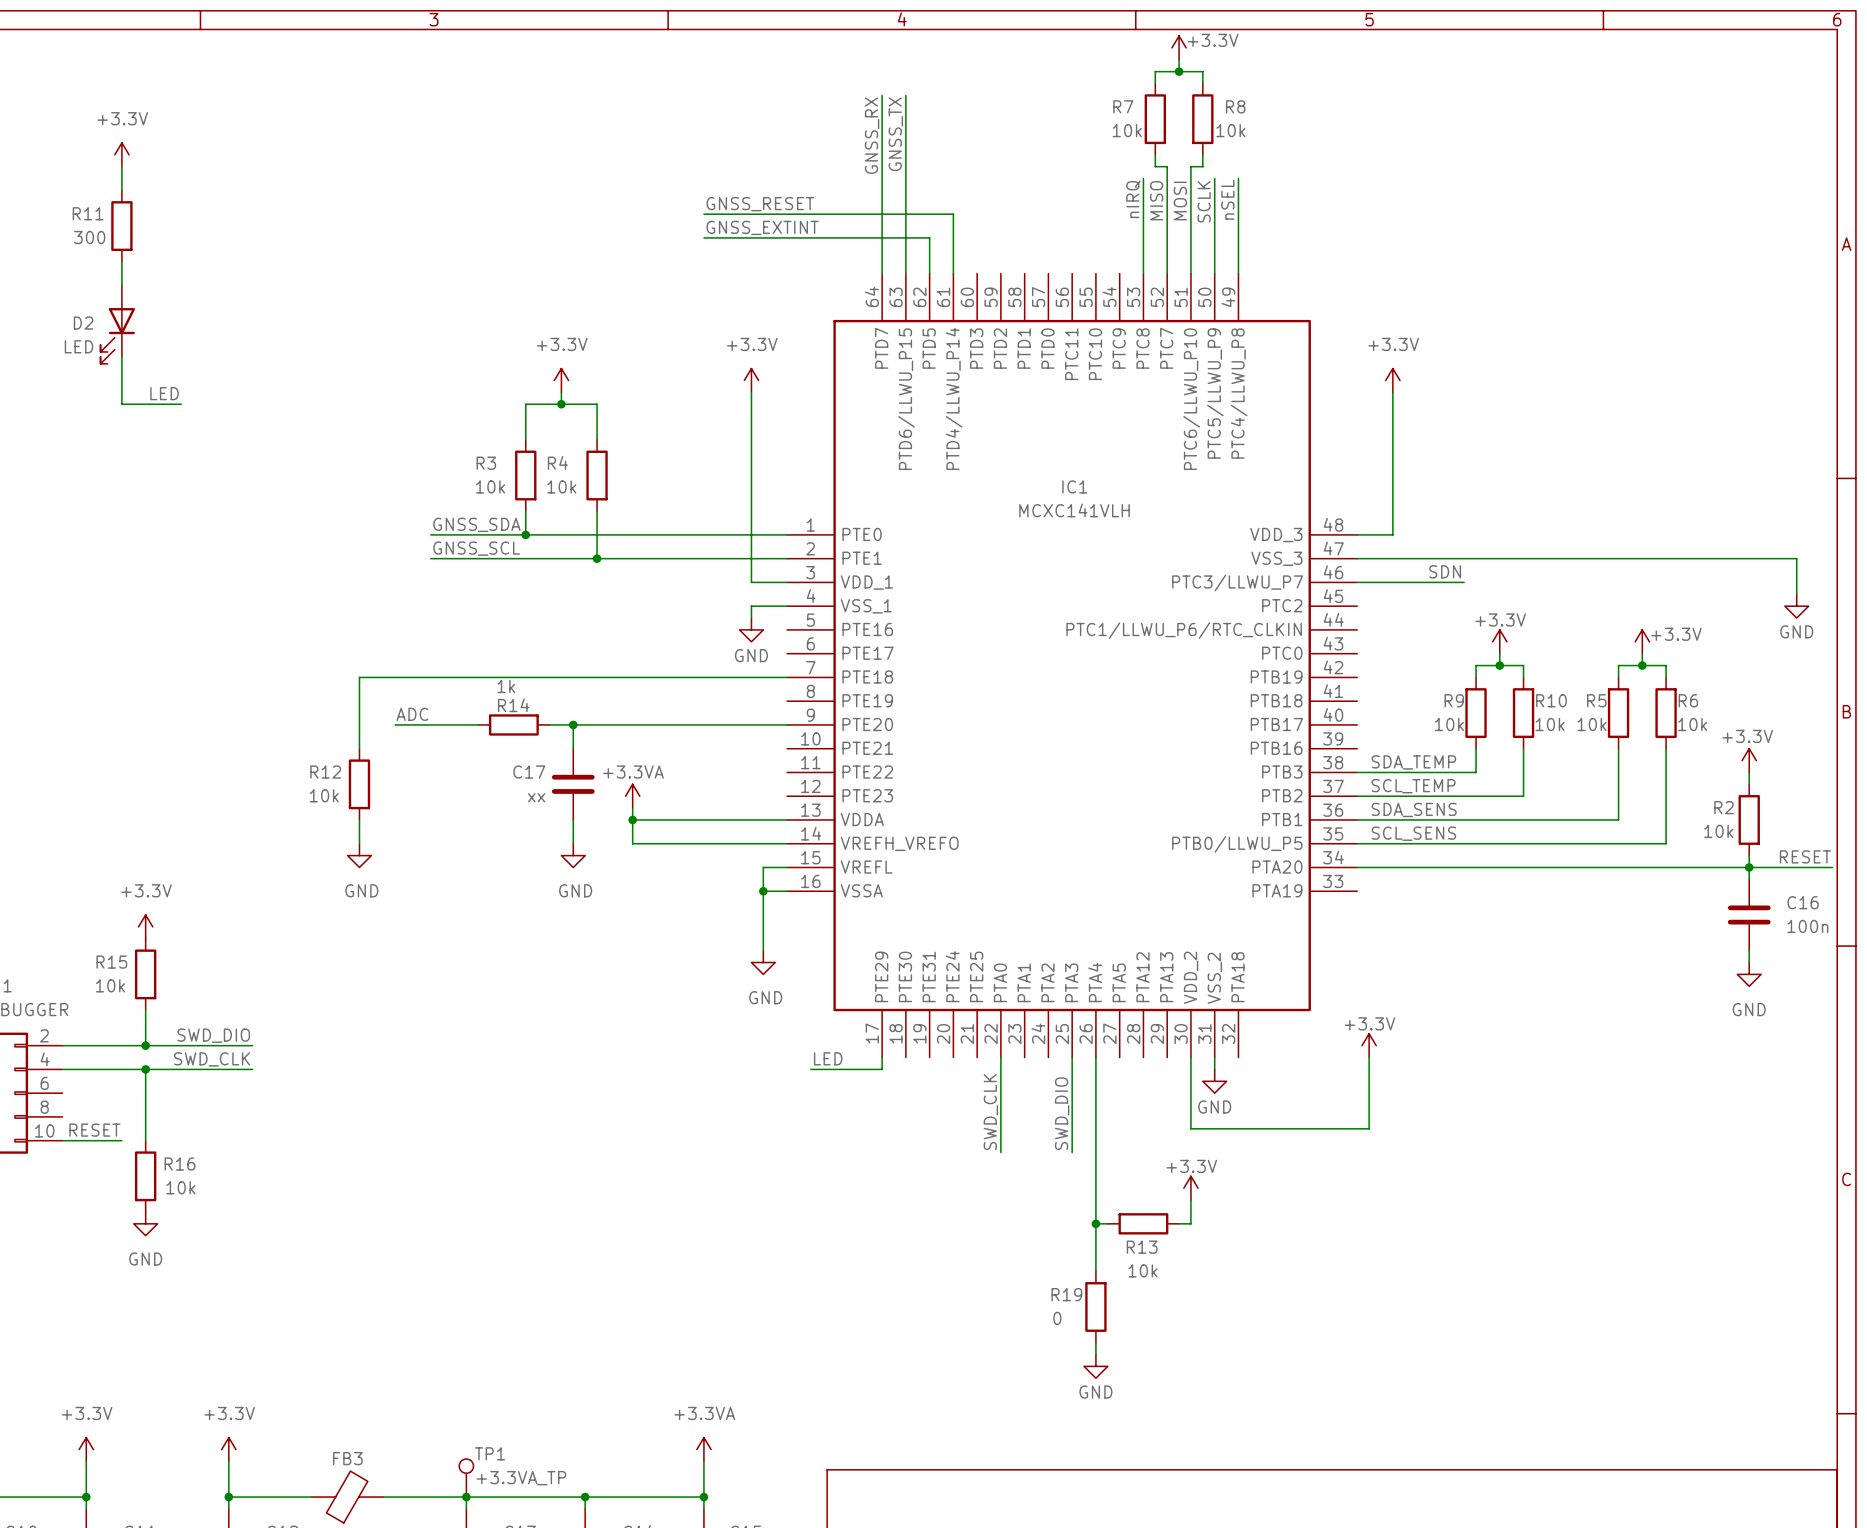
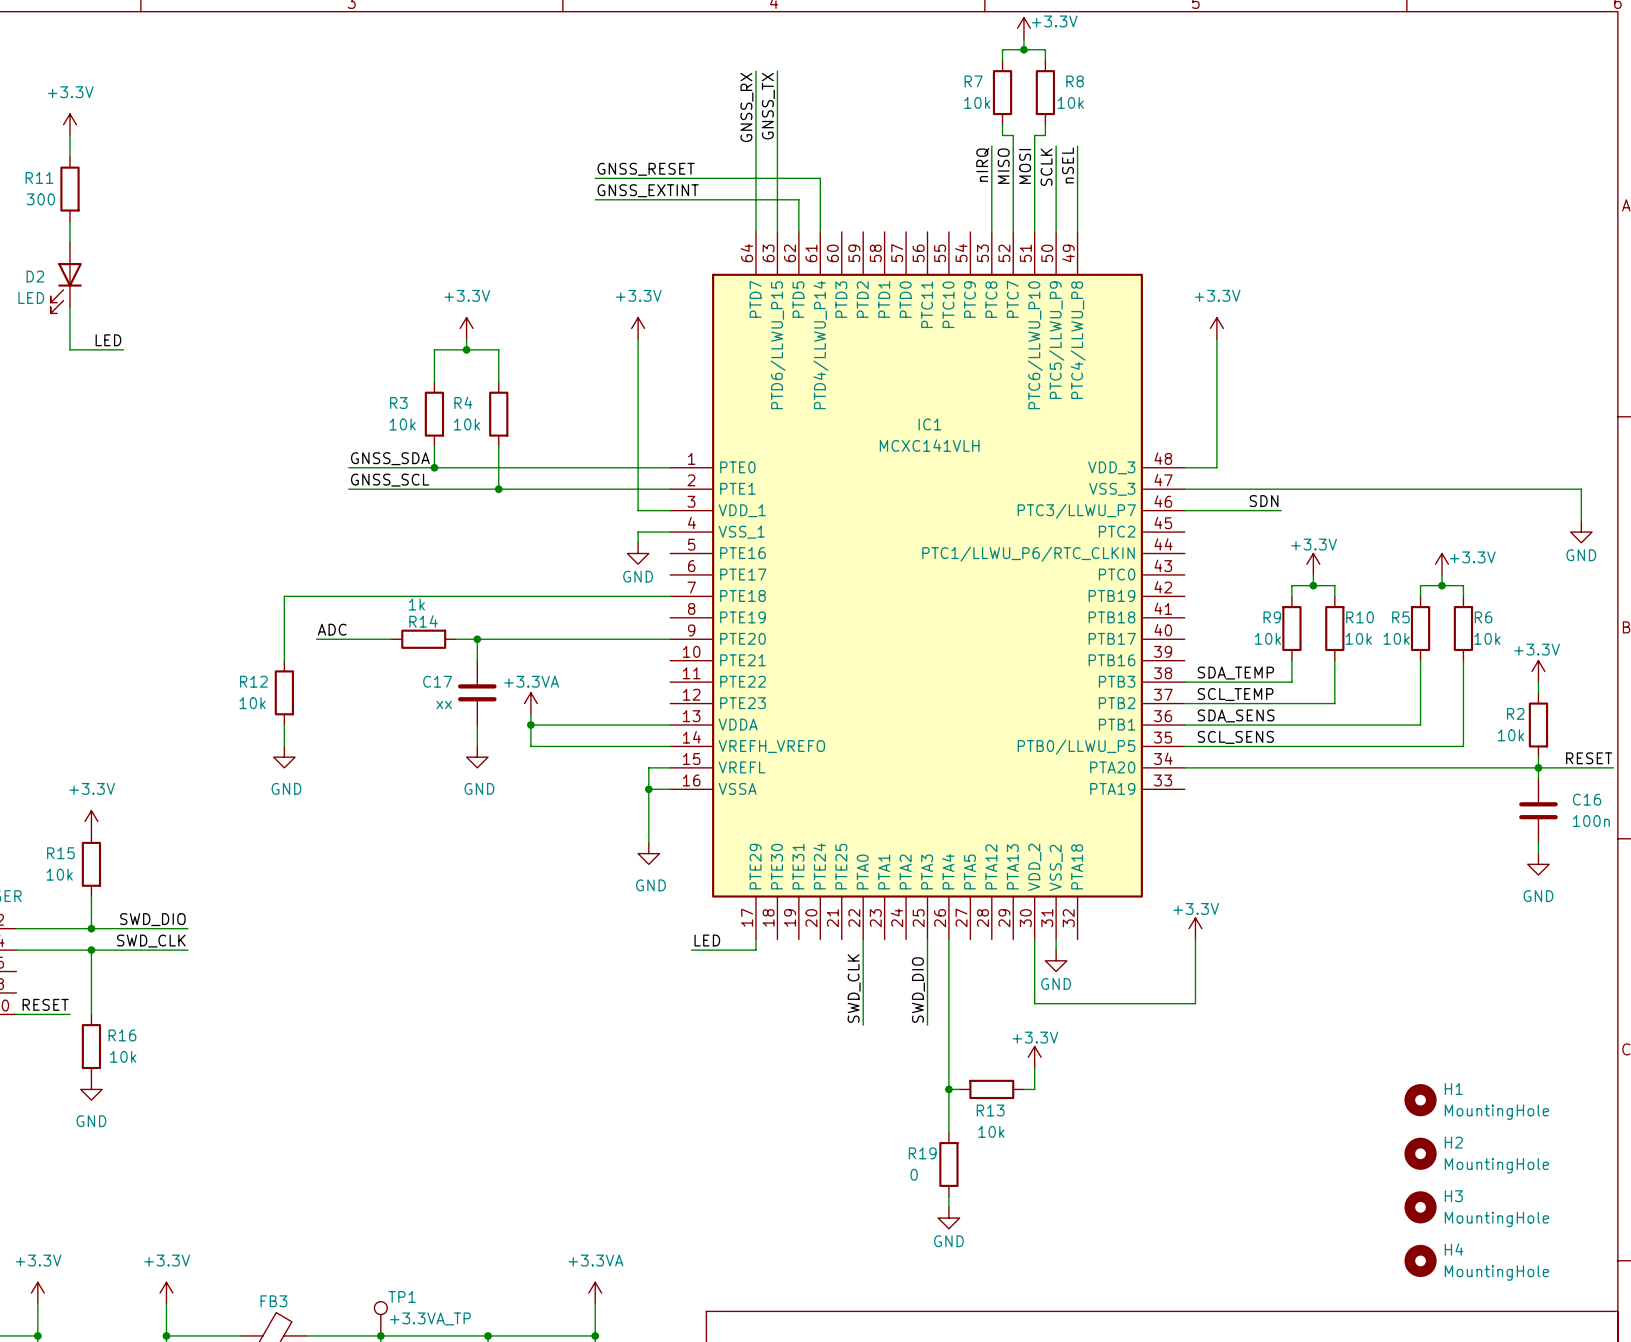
H1: none -> MountingHole (1420, 1100)
H2: none -> MountingHole (1420, 1153)
H3: none -> MountingHole (1420, 1207)
H4: none -> MountingHole (1420, 1260)

